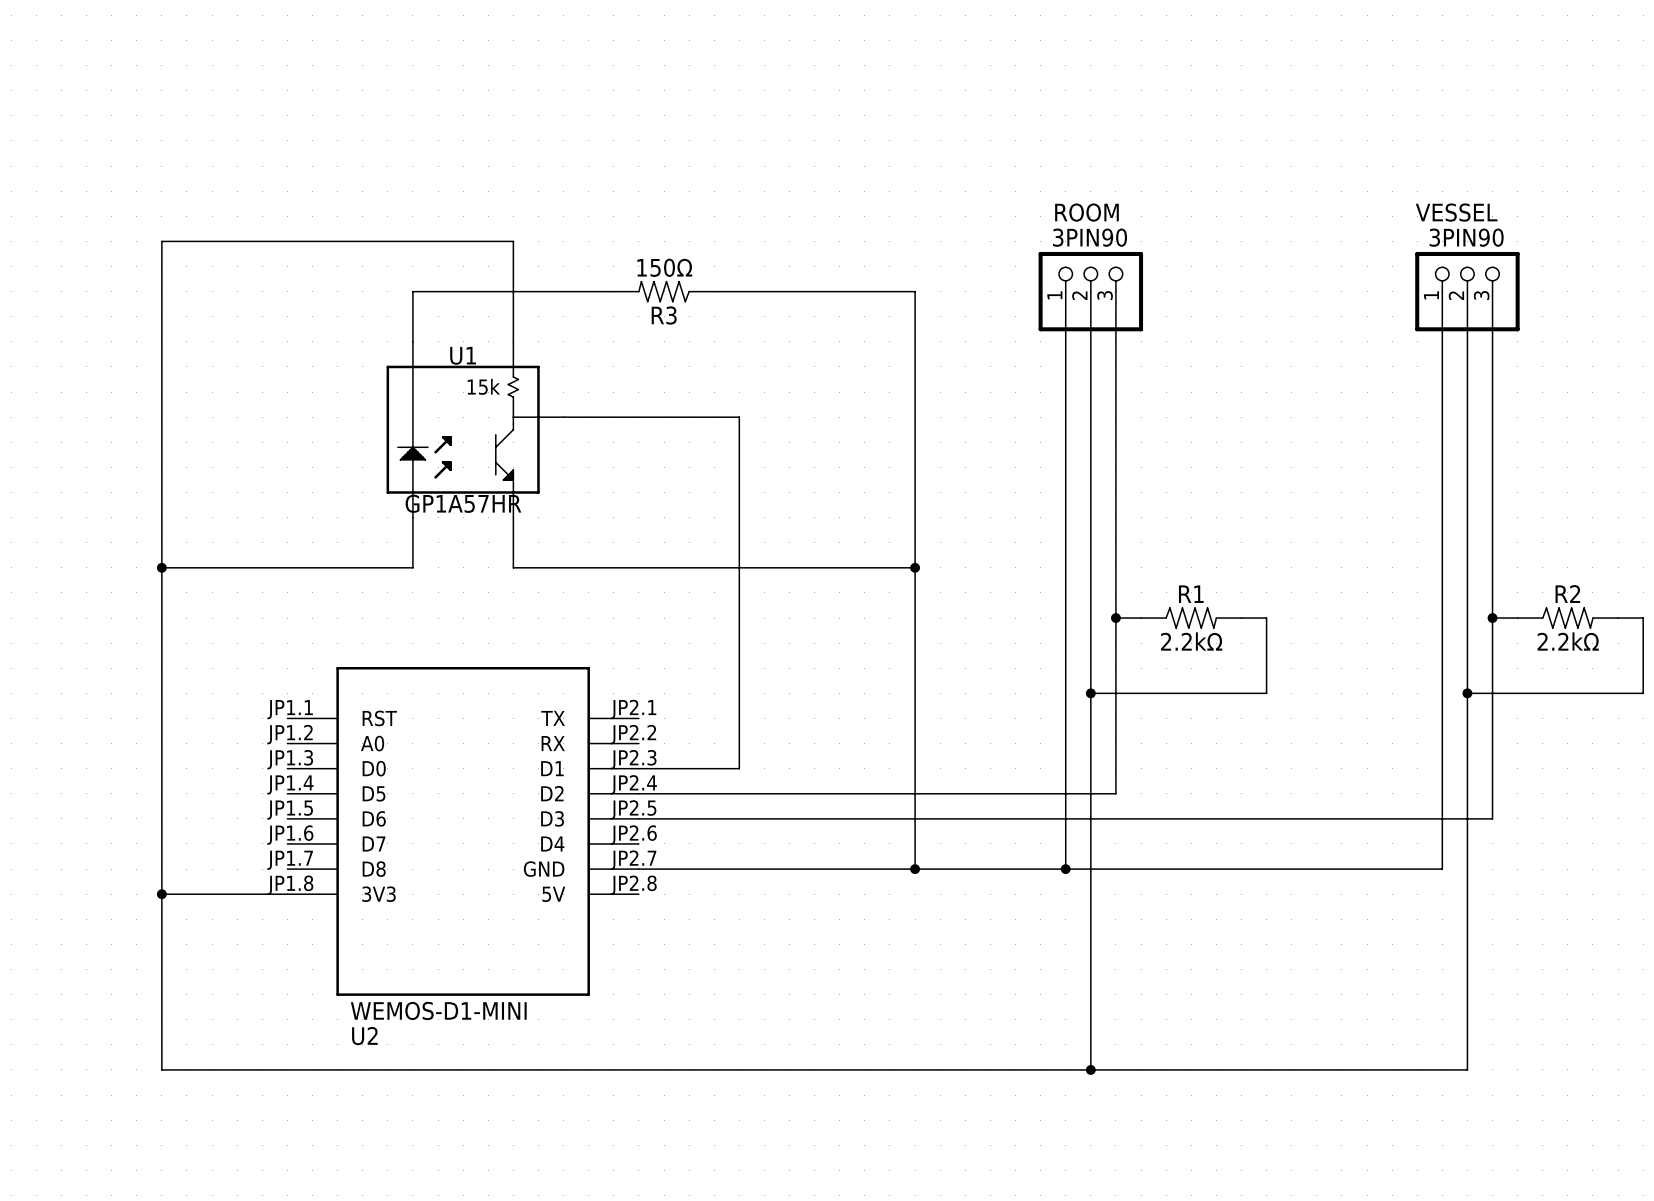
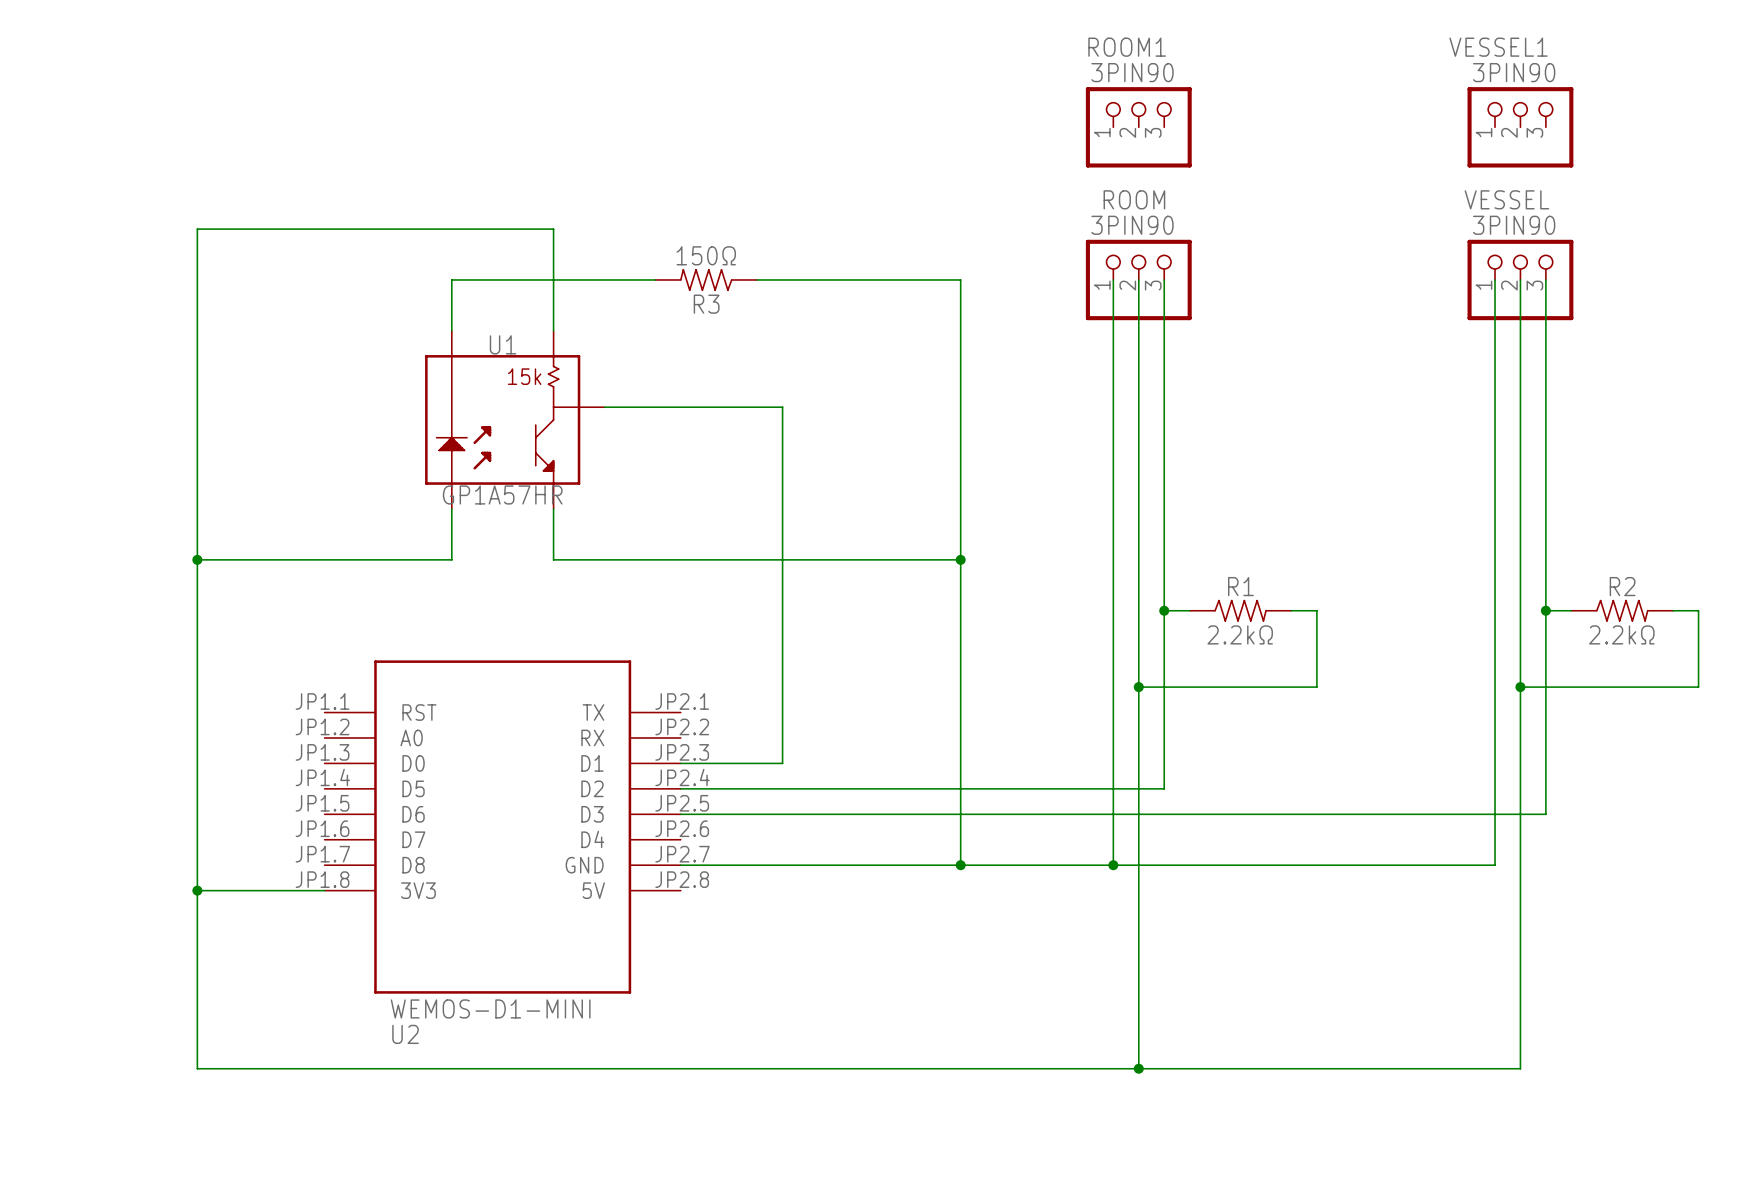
ROOM1: none -> 3PIN90 (1138, 127)
VESSEL1: none -> 3PIN90 (1520, 127)

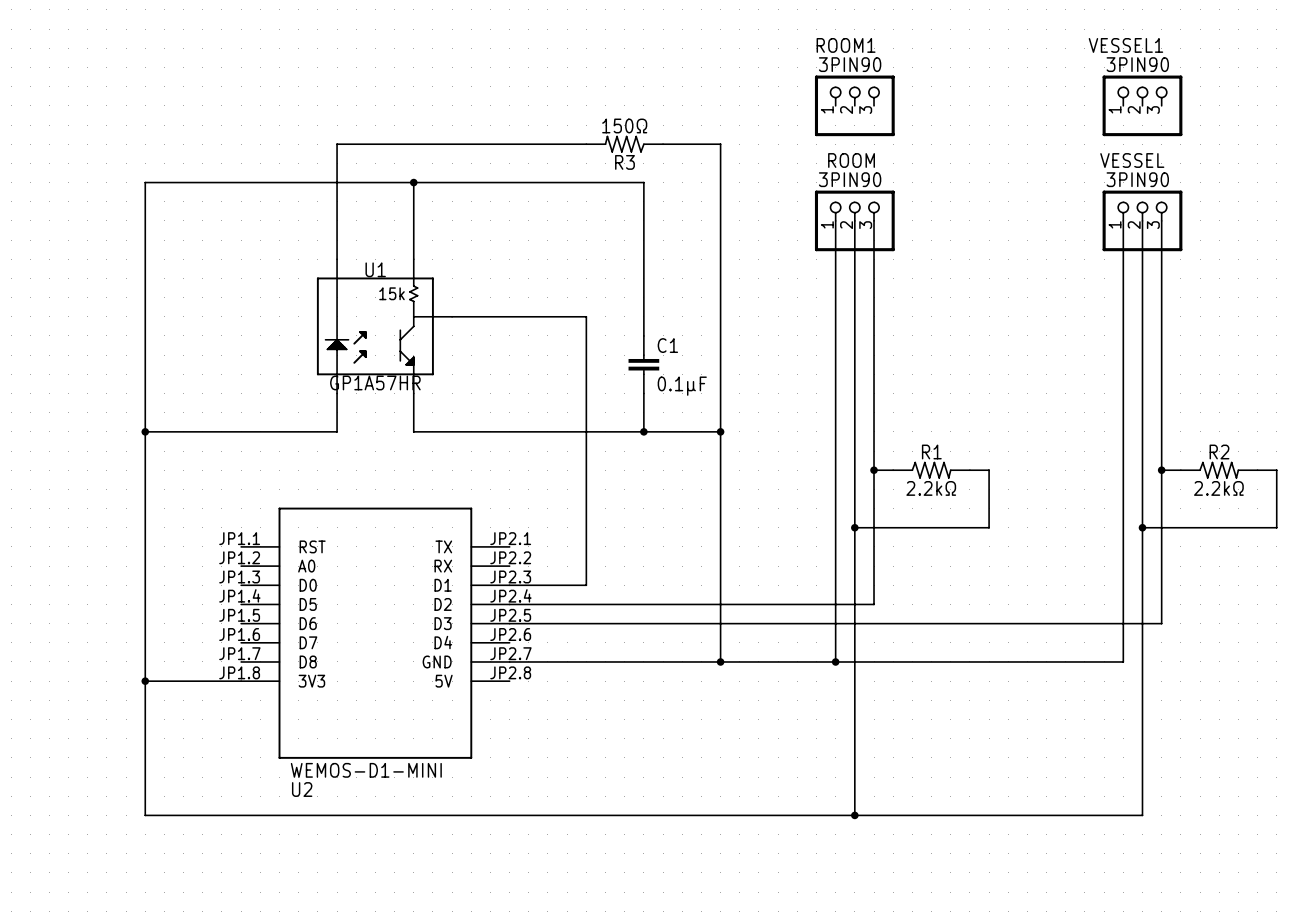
wire: none -> (413, 182) (643, 182) (643, 335)
junction: none -> (413, 182)
wire: (451, 279) (655, 279) -> (337, 220) (337, 144) (586, 144)
R3 position: (706, 279) -> (624, 144)
wire: (757, 279) (960, 279) -> (663, 144) (720, 144) (720, 220)
C1: none -> 0.1μF (643, 364)
wire: none -> (643, 393) (643, 431)
junction: none -> (643, 431)

